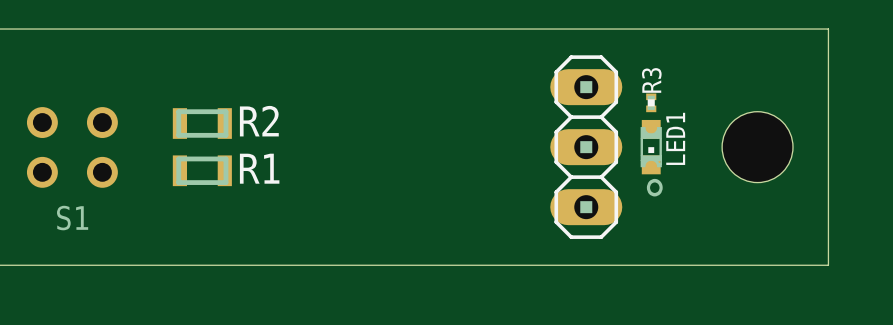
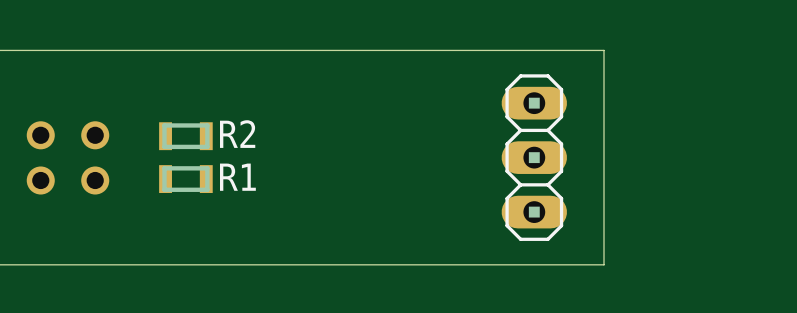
board edge: (663, 29) (828, 29) (828, 265) (663, 265) -> (604, 50) (604, 264)
R3: (651, 102) -> none
LED1: (651, 147) -> none
hole: (757, 147) -> none
text: ° (654, 187) -> none
text: S1 (72, 218) -> none

